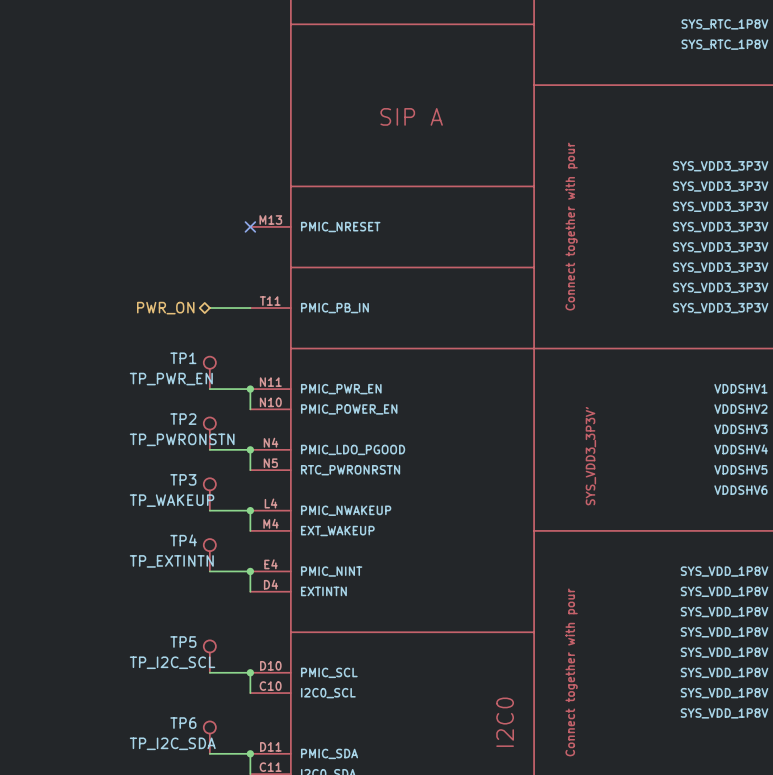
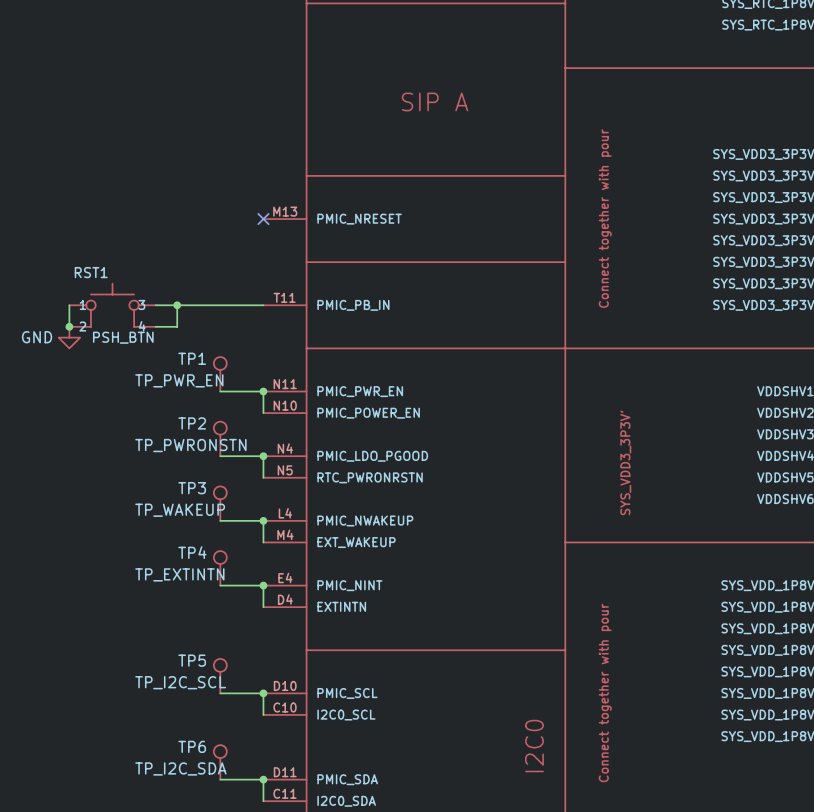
wire: none -> (69, 305) (69, 326)
RST1: none -> PSH_BTN (112, 305)
wire: none -> (155, 305) (220, 305)
hierarchical label: PWR_ON (165, 308) -> none
wire: none -> (177, 305) (177, 326) (155, 326)
junction: none -> (177, 305)
junction: none -> (69, 326)
power symbol: none -> GND (69, 337)

